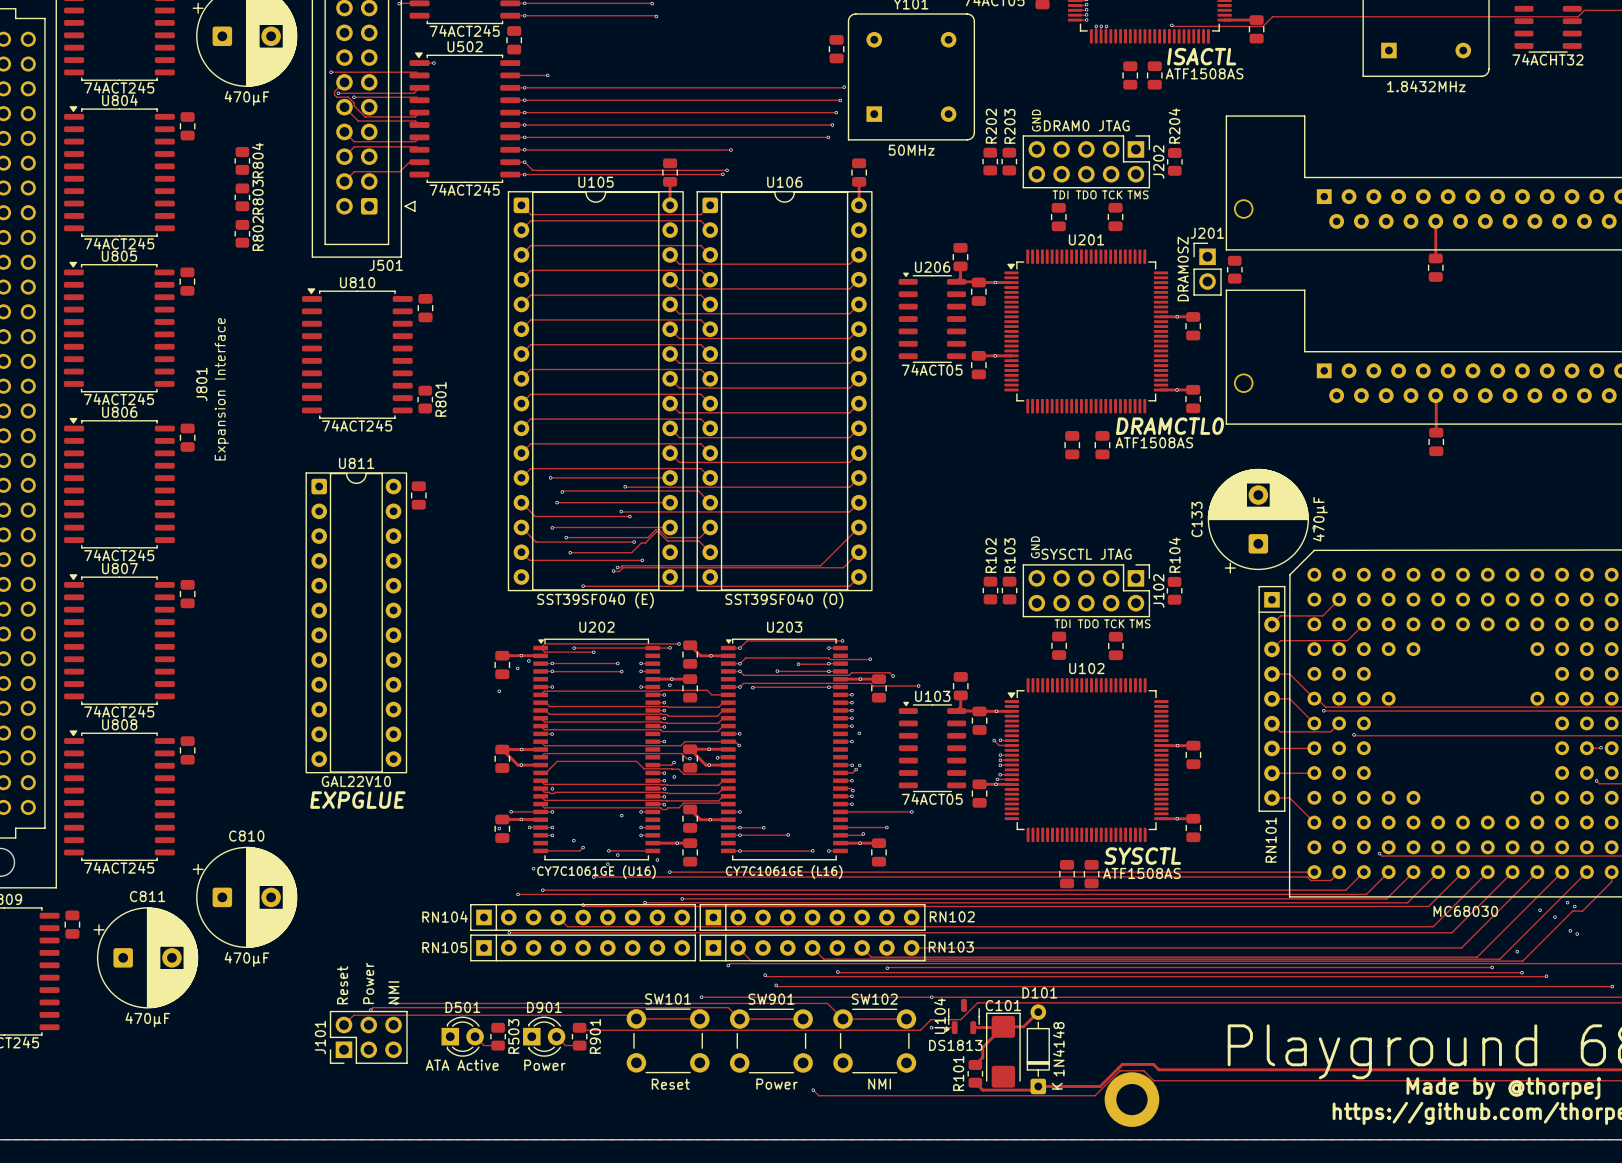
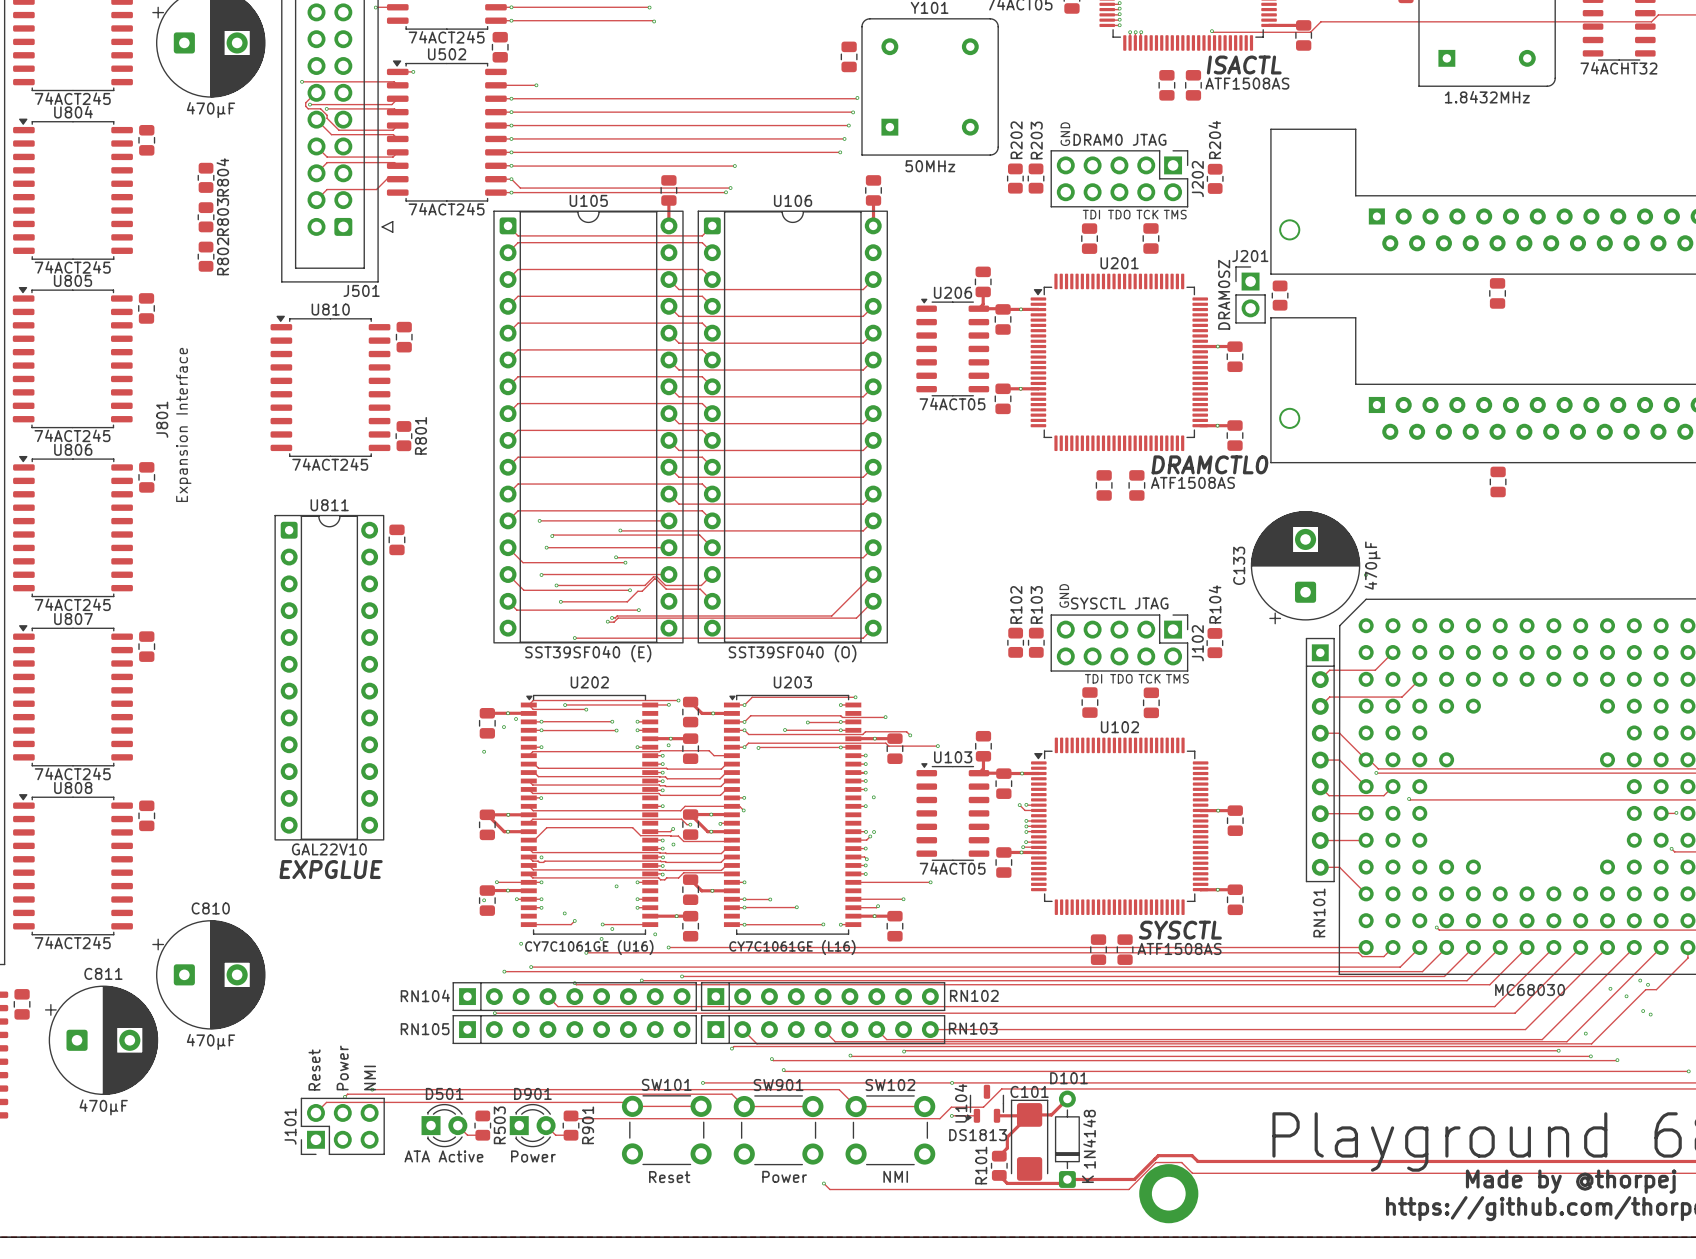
track: (1435, 221) (1435, 258) -> none
track: (1435, 395) (1436, 432) -> none

